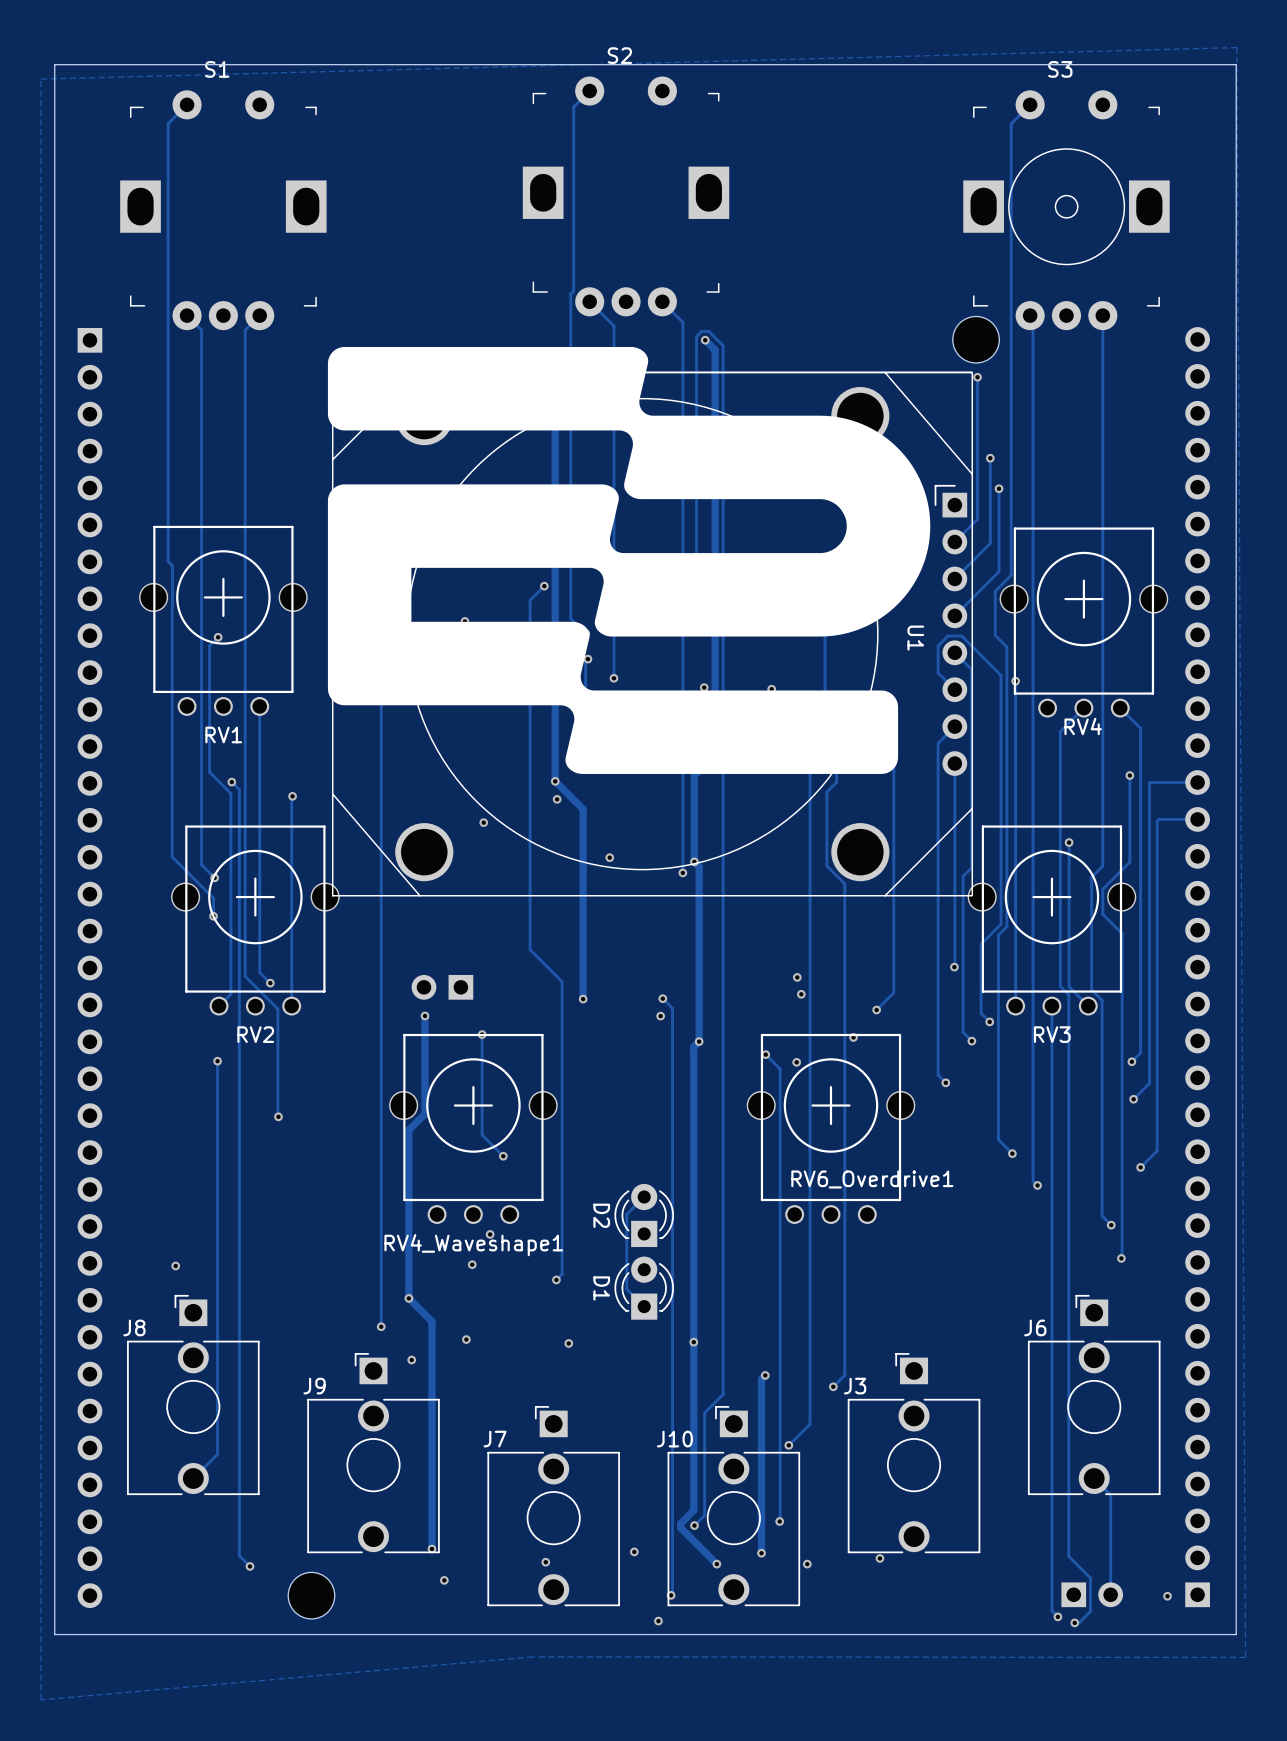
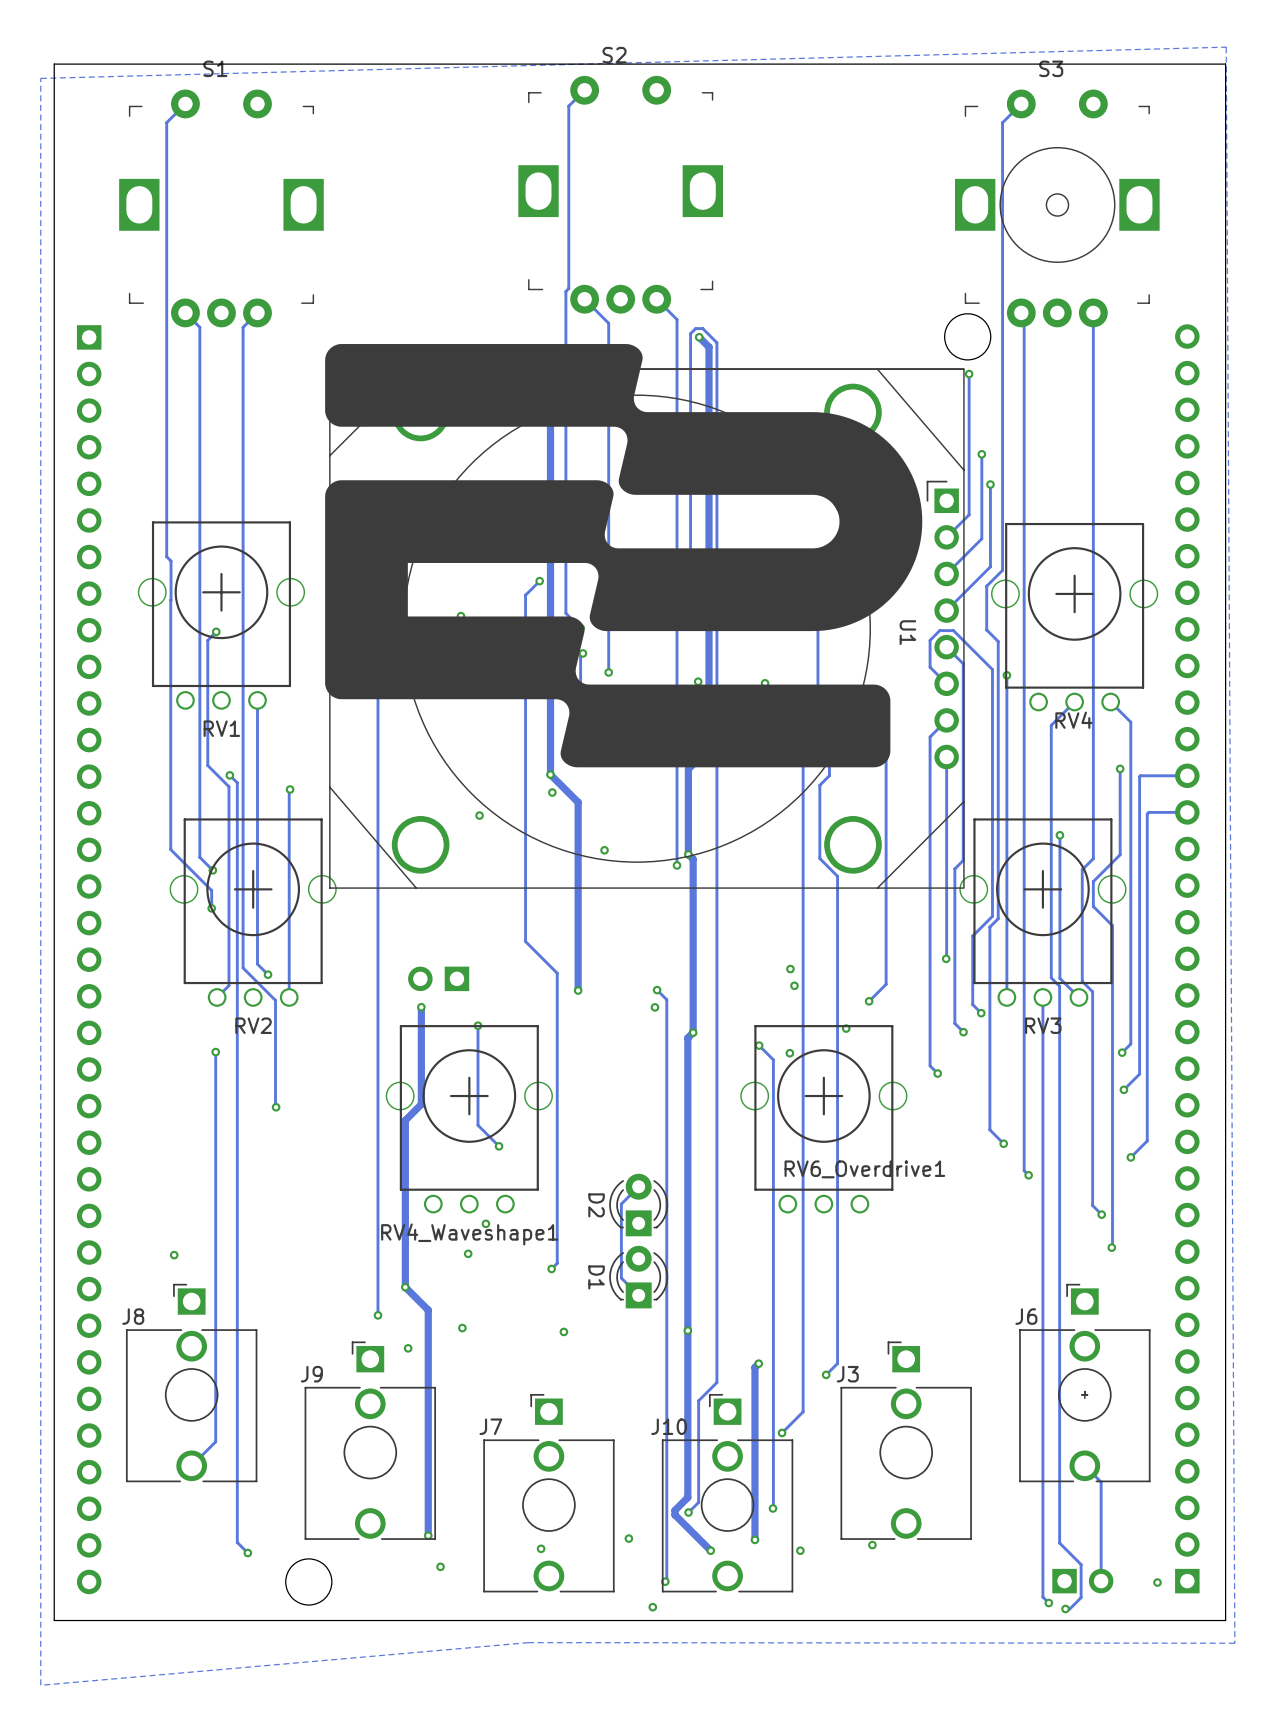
J6 footprint: [1027, 1294, 1161, 1496] -> [1019, 1283, 1151, 1483]

